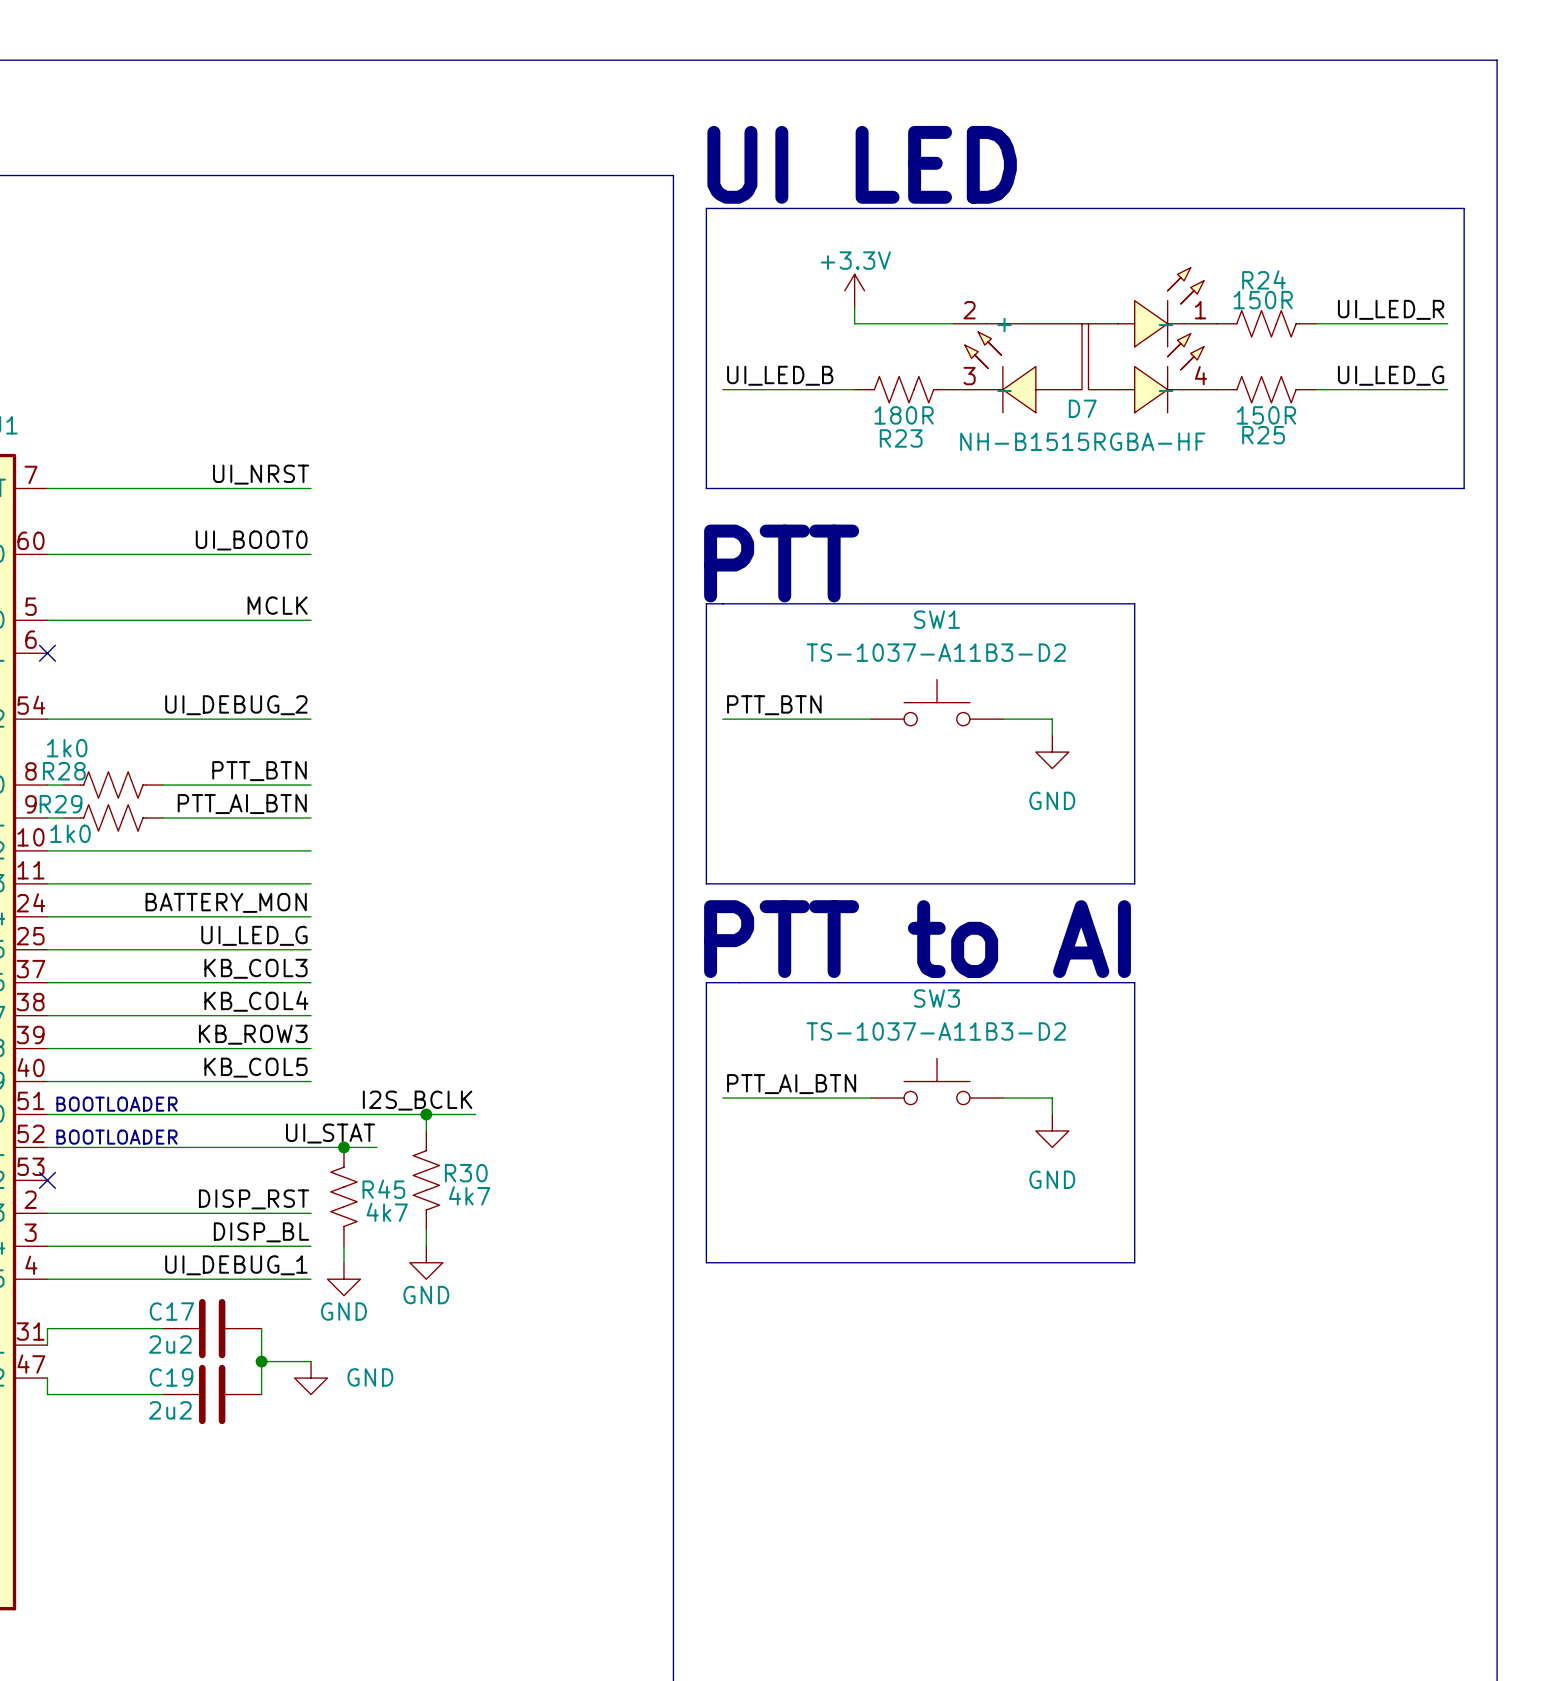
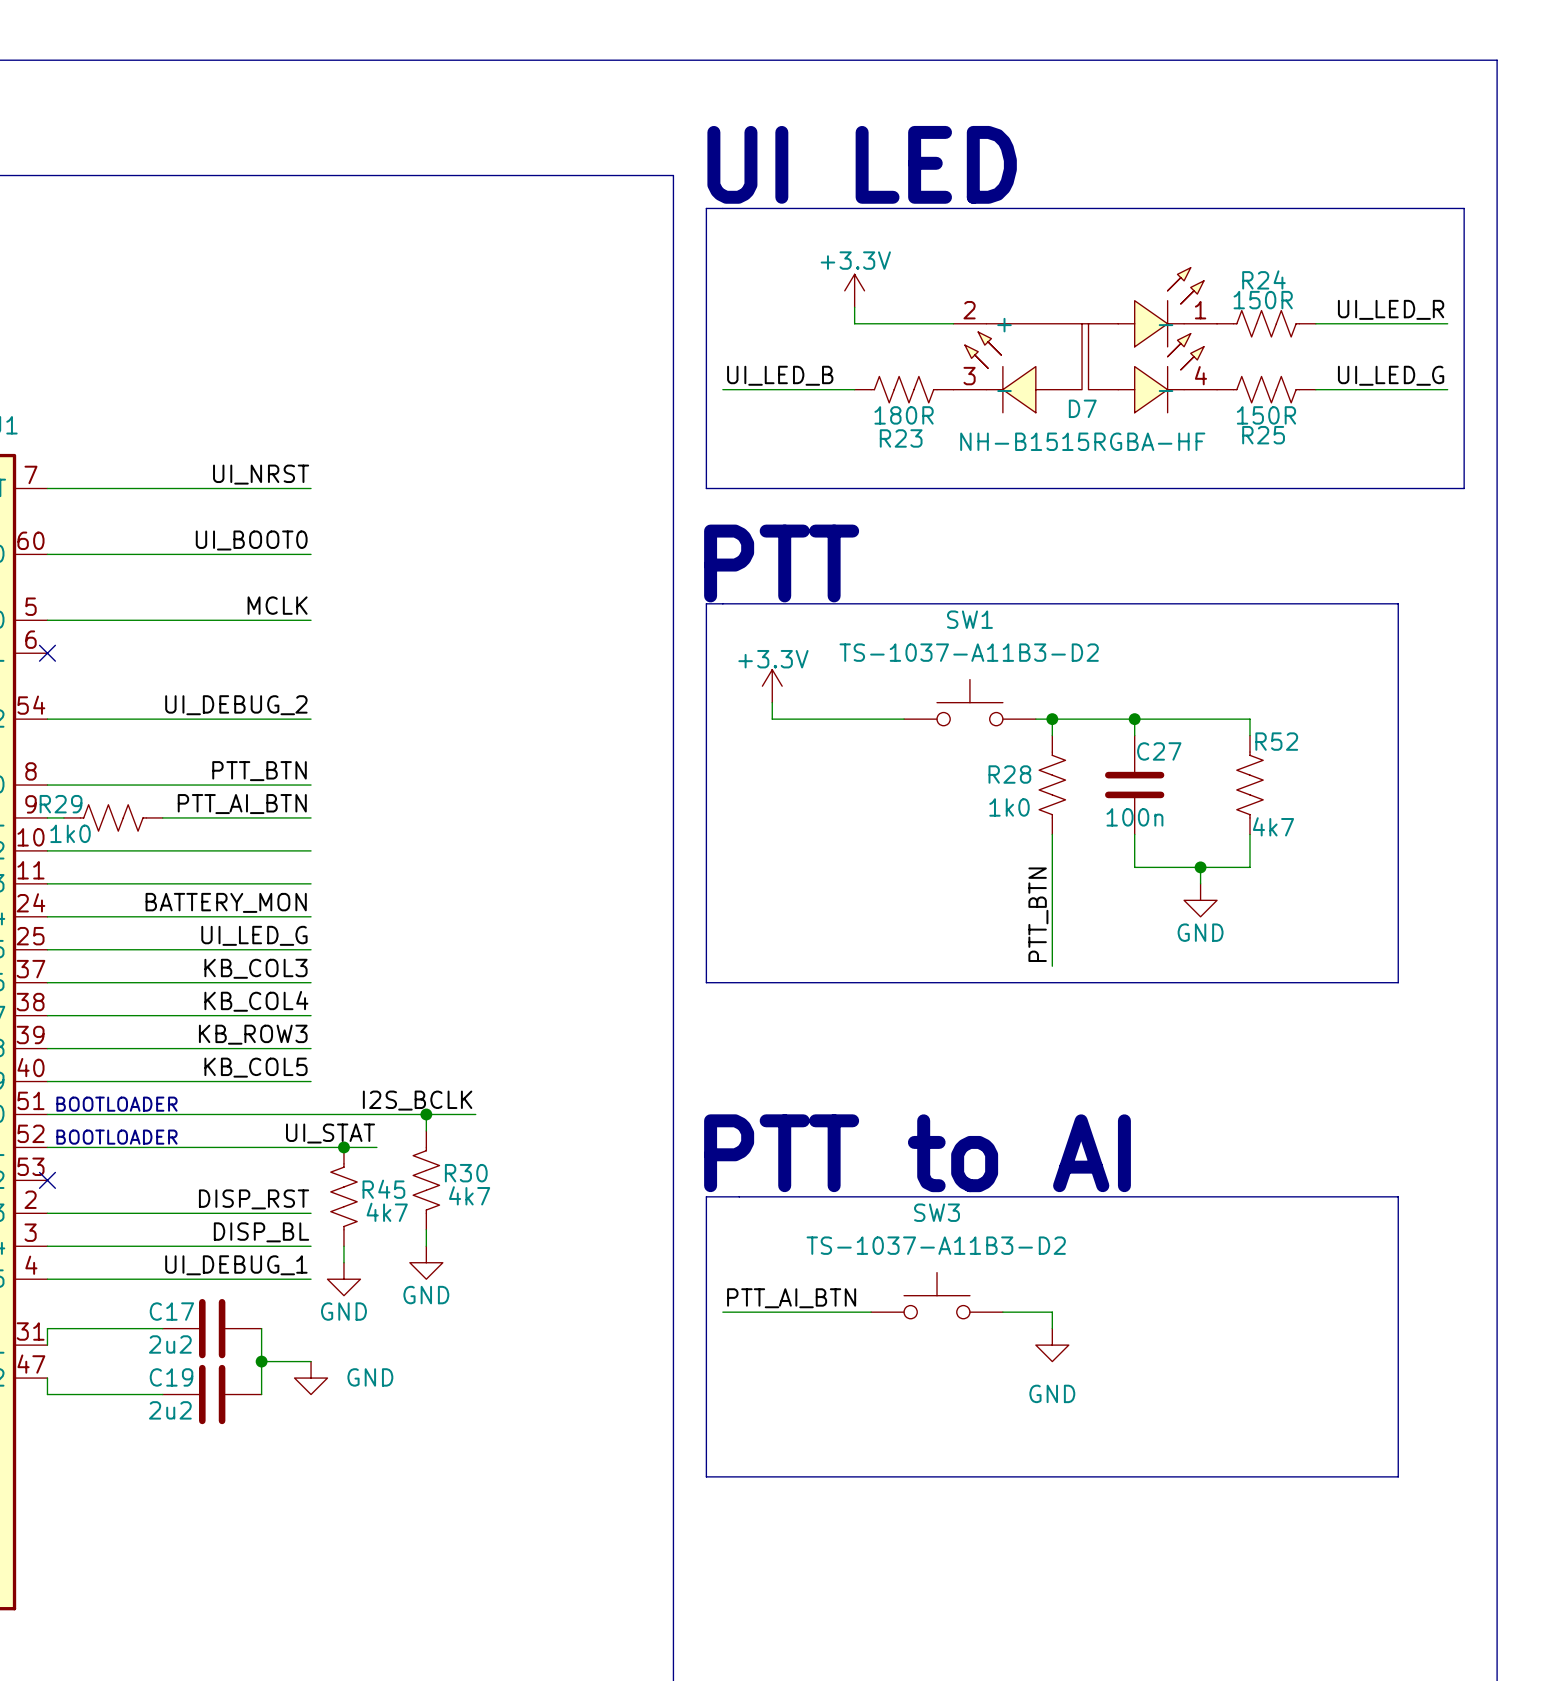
line: (1134, 603) (1134, 883) (706, 883) -> (1134, 603) (1398, 603) (1398, 982) (1134, 982)
power symbol: none -> +3.3V (772, 686)
SW1 position: (937, 702) -> (969, 702)
label: PTT_BTN (774, 705) -> none
wire: (722, 719) (772, 719) -> (772, 702) (772, 719)
wire: none -> (1052, 719) (1249, 719) (1249, 735)
junction: none -> (1052, 719)
junction: none -> (1134, 719)
R28 value position: 1k0 (67, 748) -> 1k0 (1009, 807)
power symbol: GND (1052, 752) -> none
wire: none -> (63, 785) (162, 785)
R28 rotation: 0° (113, 785) -> 90° clockwise (1052, 785)
R28 position: (113, 785) -> (1052, 785)
C27: none -> 100n (1134, 785)
R52: none -> 4k7 (1249, 785)
wire: none -> (1052, 834) (1052, 966)
wire: none -> (1134, 834) (1134, 867) (1249, 867) (1249, 834)
wire: none -> (1200, 867) (1200, 883)
junction: none -> (1200, 867)
line: none -> (706, 883) (706, 982)
power symbol: none -> GND (1200, 900)
label: none -> PTT_BTN (1038, 914)
text position: PTT to AI (917, 939) -> PTT to AI (917, 1153)
line: (706, 982) (706, 1196) -> (706, 1262) (706, 1476) (1398, 1476) (1398, 1196) (706, 1196)
line: (1134, 982) (1134, 1262) (706, 1262) -> none
SW3 position: (937, 1081) -> (937, 1295)
label position: PTT_AI_BTN (791, 1084) -> PTT_AI_BTN (791, 1298)
wire: (722, 1098) (871, 1098) -> (722, 1312) (871, 1312)
wire: (1002, 1098) (1052, 1098) (1052, 1114) -> (1002, 1312) (1052, 1312) (1052, 1328)
power symbol: GND (1052, 1130) -> none
power symbol: none -> GND (1052, 1345)

